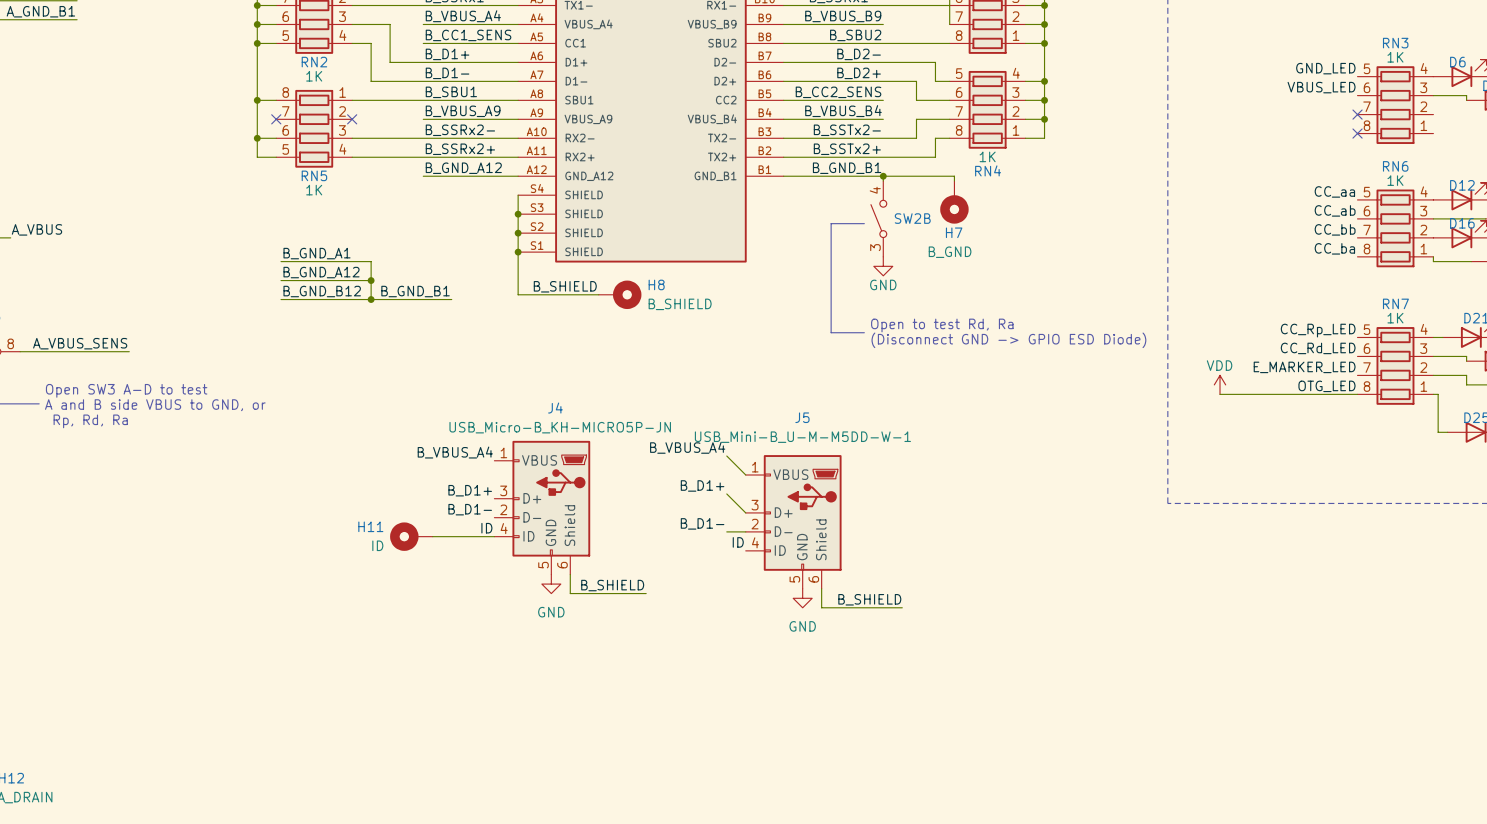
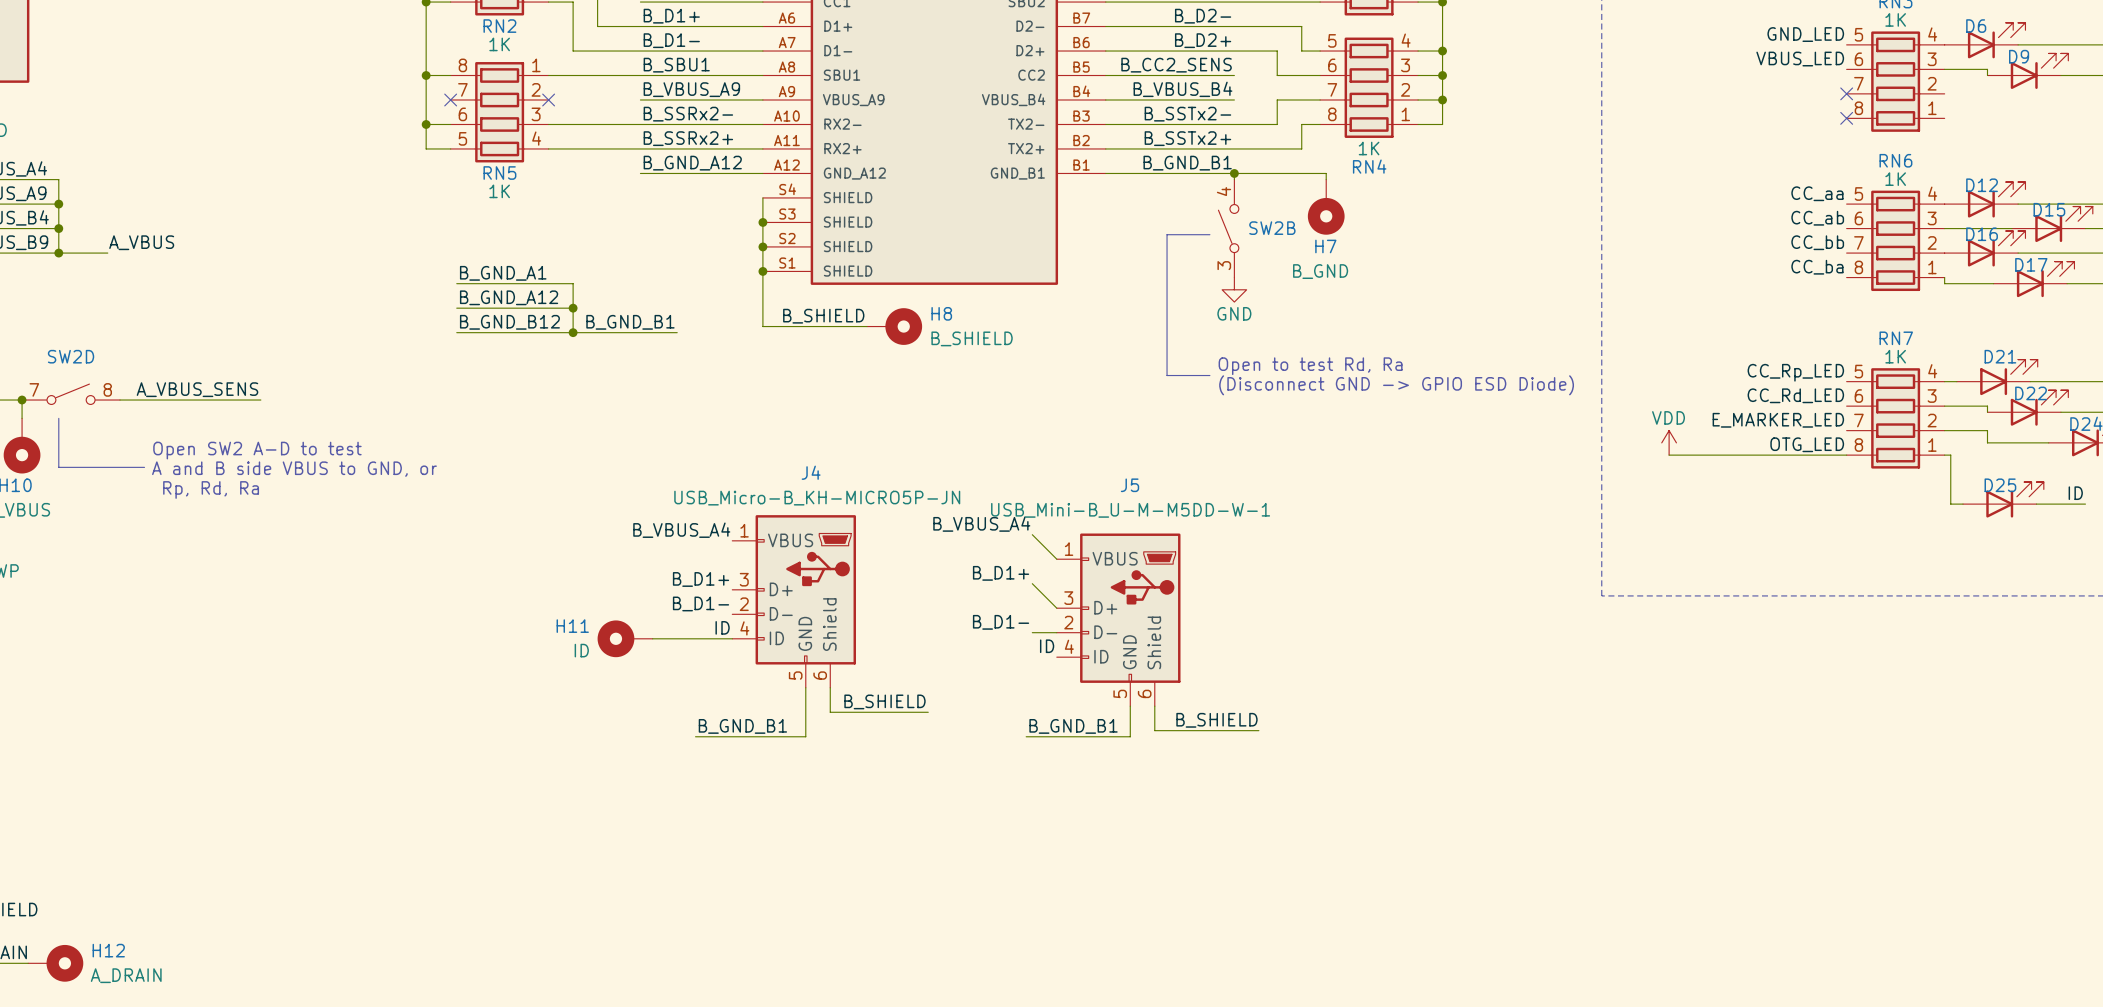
text: Open SW3 A-D to test (126, 390) -> Open SW2 A-D to test (257, 450)
wire: none -> (805, 687) (805, 736) (695, 736)
power symbol: GND (551, 584) -> none
wire: none -> (1130, 706) (1130, 736) (1026, 736)
power symbol: GND (802, 598) -> none
label: none -> B_GND_B1 (742, 726)
label: none -> B_GND_B1 (1073, 726)

